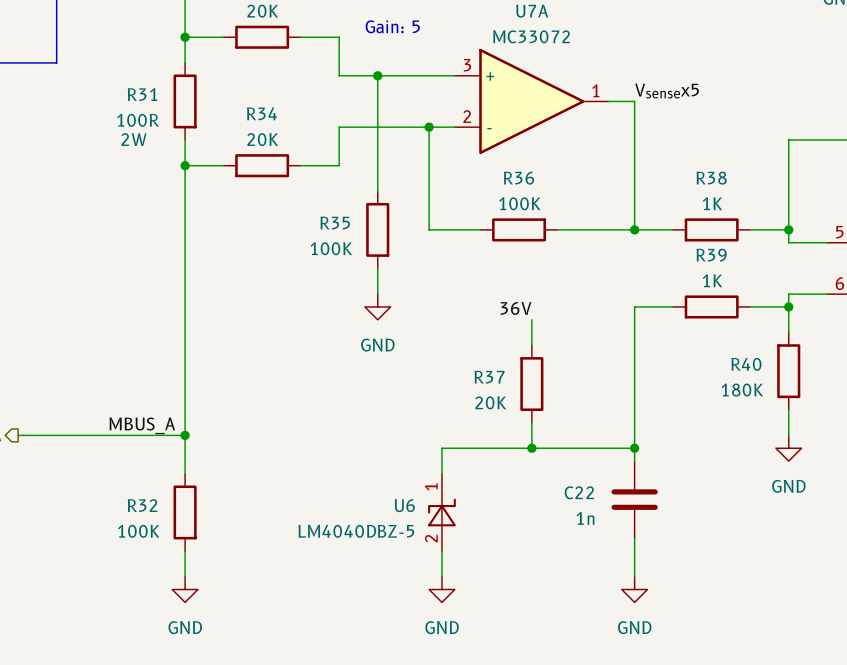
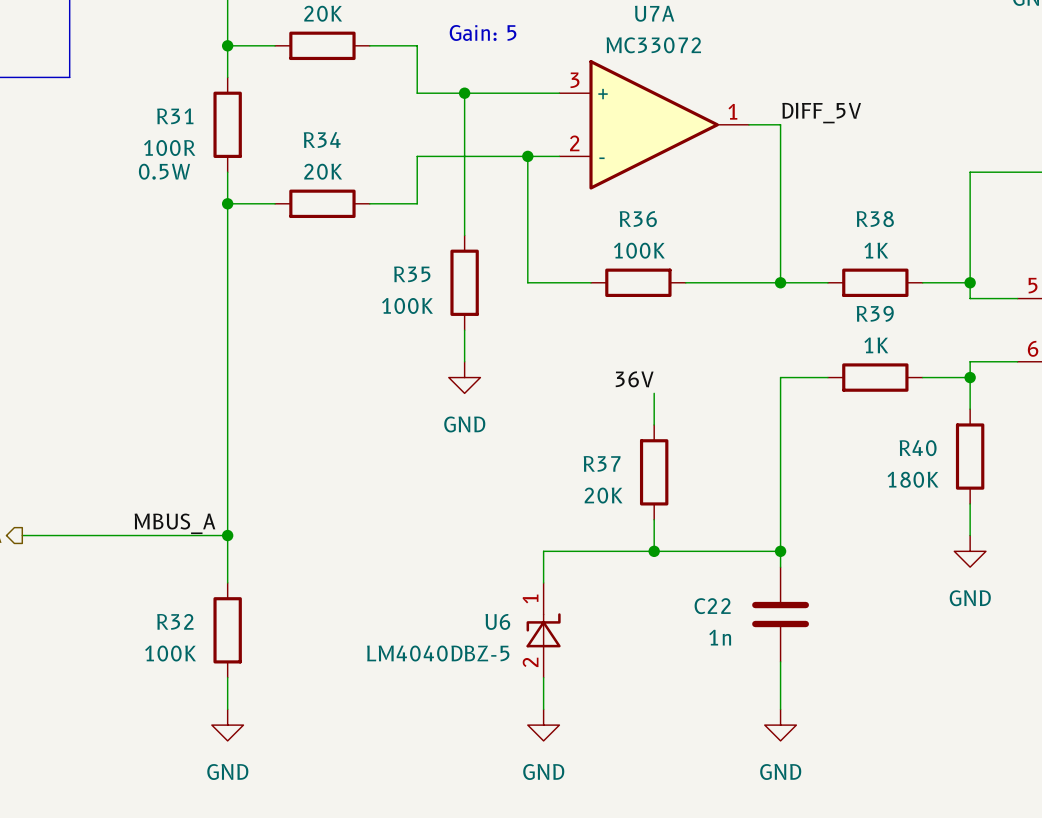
label: Vsensex5 (667, 91) -> DIFF_5V (821, 113)
R31 text: 2W (133, 139) -> 0.5W (164, 171)

